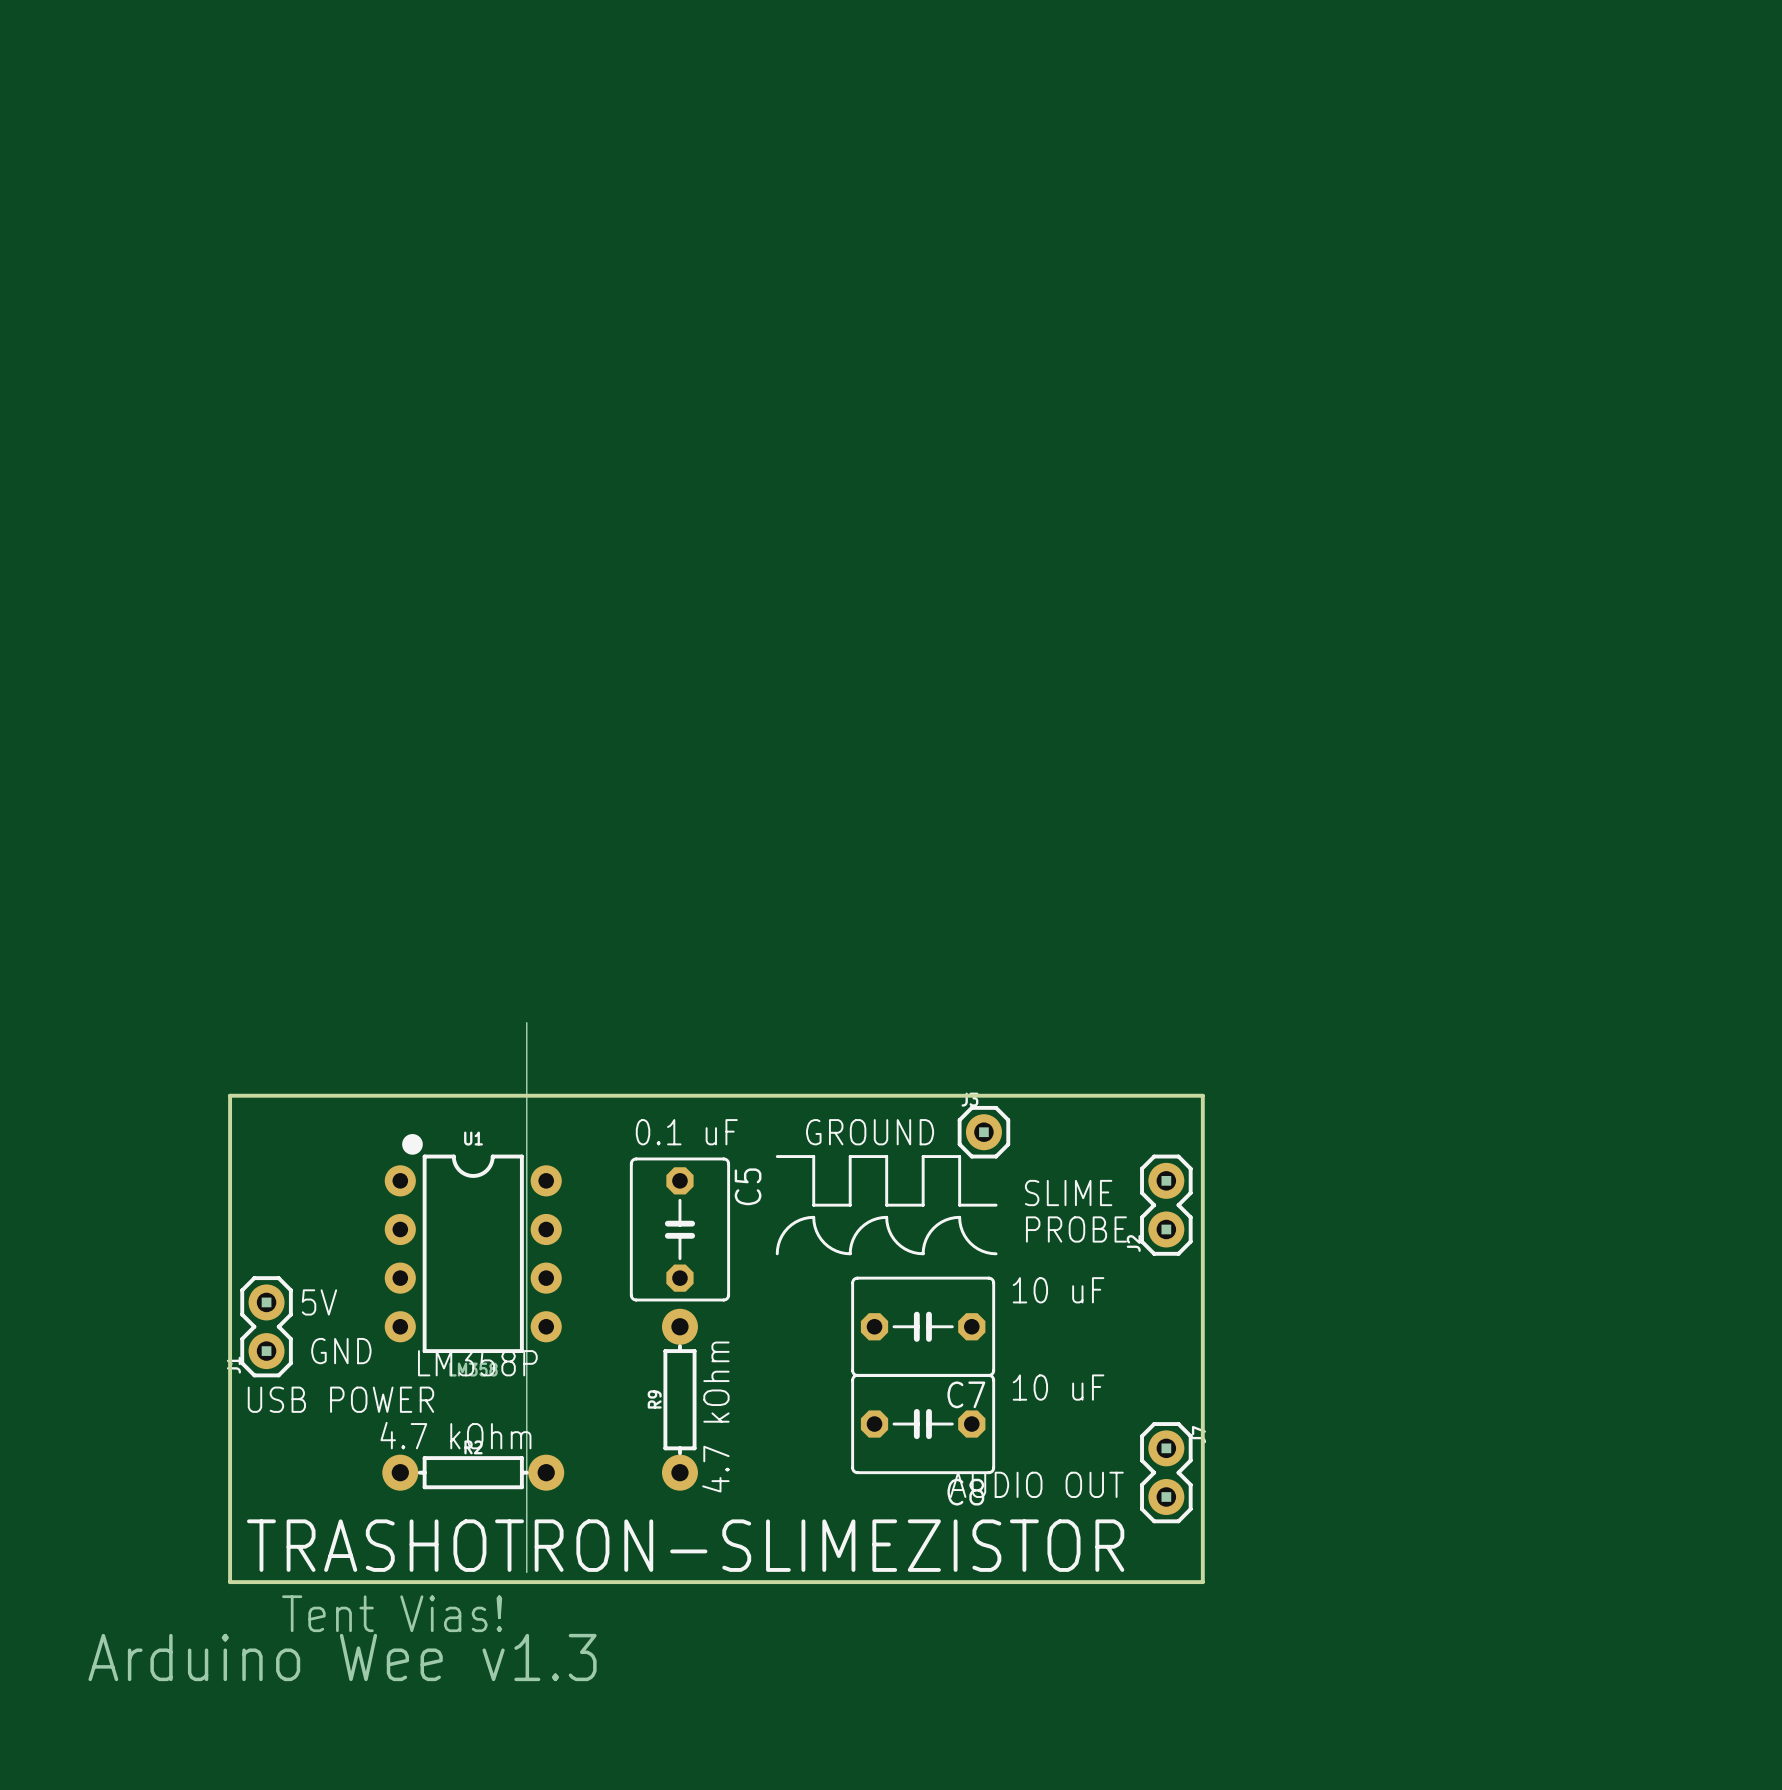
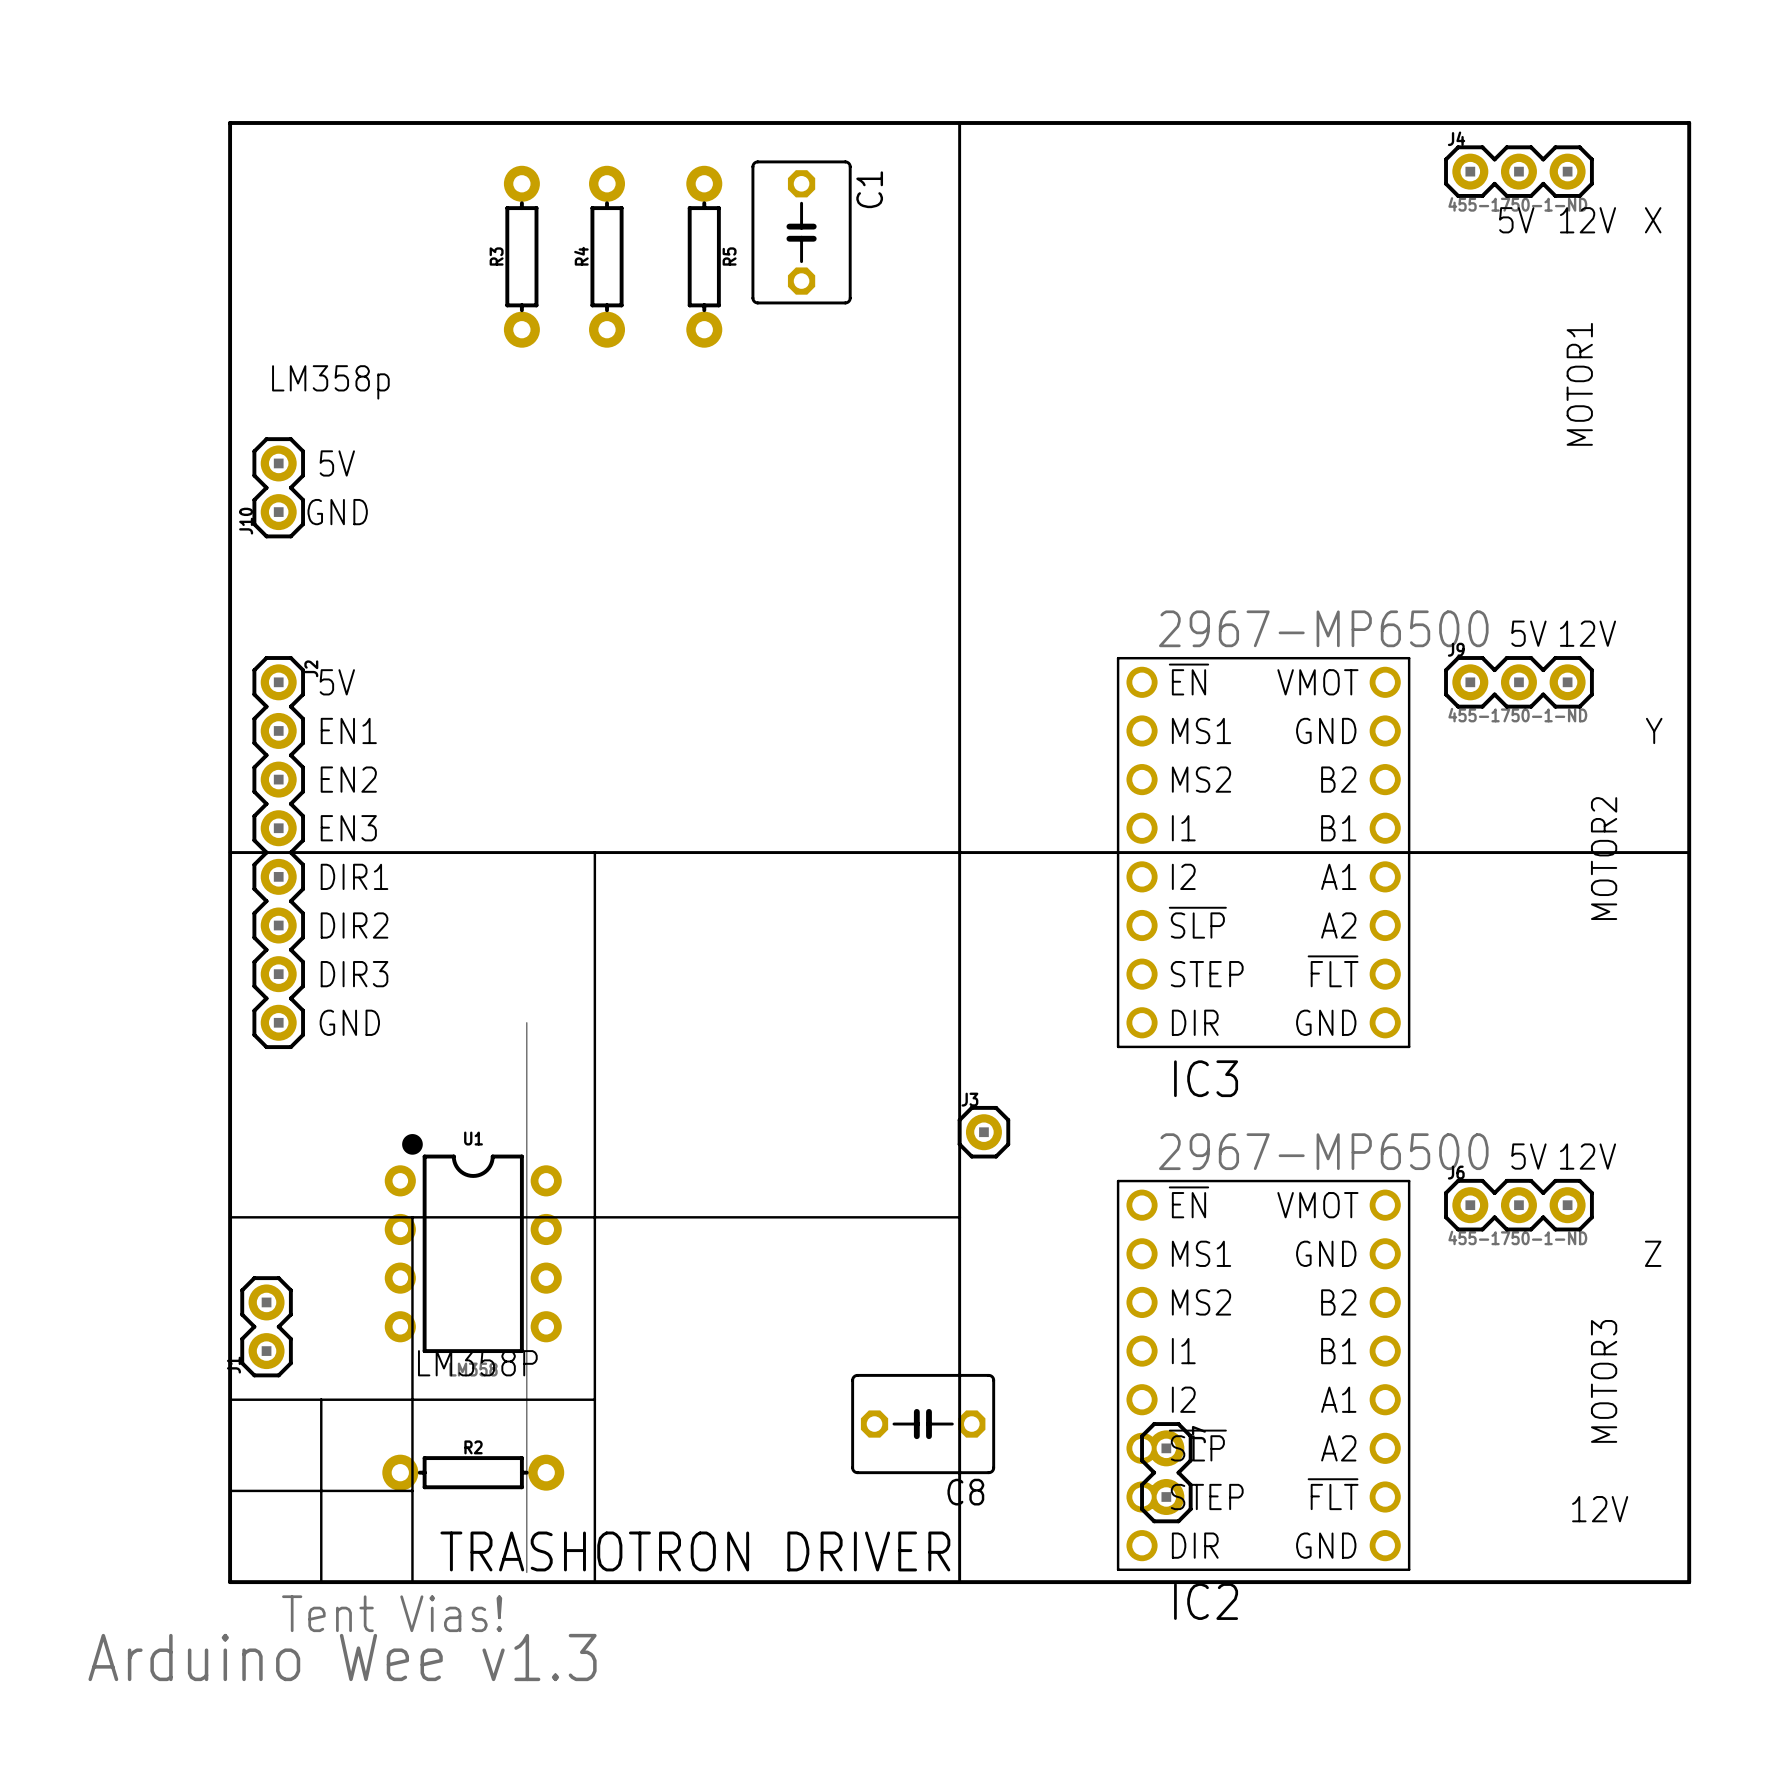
J4: none -> 455-1750-1-ND (1518, 171)
text: none -> 5V (1516, 220)
text: none -> 12V (1587, 220)
text: none -> X (1653, 220)
C1: none -> (801, 232)
R3: none -> (521, 256)
R4: none -> (607, 256)
R5: none -> (704, 256)
text: none -> LM358p (330, 382)
text: none -> MOTOR1 (1579, 384)
text: none -> 5V (337, 463)
J10: none -> (278, 487)
text: none -> GND (337, 512)
text: none -> 5V (1528, 633)
text: none -> 12V (1587, 633)
text: none -> 5V (337, 682)
J9: none -> 455-1750-1-ND (1518, 682)
text: none -> EN1 (348, 730)
text: none -> Y (1654, 730)
text: none -> EN2 (348, 779)
text: none -> EN3 (348, 828)
line: none -> (230, 852) (1689, 852)
line: none -> (594, 852) (594, 1582)
IC3: none -> 2967-MP6500 (1263, 852)
text: none -> MOTOR2 (1604, 858)
text: none -> DIR1 (354, 876)
text: none -> DIR2 (354, 925)
text: none -> DIR3 (354, 974)
board edge: (230, 1095) (1202, 1095) (1202, 1582) -> (230, 1095) (230, 122) (1689, 122) (1689, 1582) (1202, 1582)
text: 0.1 uF (686, 1132) -> none
text: GROUND (870, 1132) -> none
J2 footprint: [1140, 1154, 1193, 1256] -> [252, 656, 305, 1050]
line: (777, 1156) (813, 1156) (813, 1205) (850, 1205) (850, 1156) (886, 1156) (886, 1205) (923, 1205) (923, 1156) (959, 1156) -> (959, 122) (959, 1156)
text: none -> 5V (1528, 1156)
text: none -> 12V (1587, 1156)
text: SLIME (1068, 1193) -> none
line: (959, 1205) (996, 1205) -> (959, 1205) (959, 1582)
J6: none -> 455-1750-1-ND (1518, 1205)
line: none -> (230, 1217) (959, 1217)
line: none -> (412, 1217) (412, 1582)
C5: (679, 1229) -> none
text: PROBE (1076, 1229) -> none
J2 name position: J2 (1133, 1243) -> J2 (311, 668)
line: (777, 1253) (780, 1239) (787, 1228) (799, 1220) (813, 1217) (814, 1226) (821, 1239) (831, 1248) (840, 1252) (850, 1253) (855, 1235) (864, 1224) (877, 1218) (886, 1217) (889, 1231) (897, 1243) (909, 1251) (923, 1253) (925, 1239) (933, 1228) (945, 1220) (959, 1217) (962, 1231) (970, 1243) (982, 1251) (996, 1253) -> none
text: none -> Z (1653, 1253)
text: 10 uF (1058, 1290) -> none
text: 5V (319, 1302) -> none
C7: (923, 1326) -> none
text position: GND (341, 1351) -> GND (349, 1022)
IC2: none -> 2967-MP6500 (1263, 1375)
text: none -> MOTOR3 (1604, 1381)
text: 10 uF (1058, 1387) -> none
line: none -> (230, 1399) (594, 1399)
line: none -> (321, 1399) (321, 1582)
text: USB POWER (340, 1399) -> none
R9: (679, 1399) -> none
text: 4.7 kOhm (715, 1417) -> none
text: 4.7 kOhm (455, 1435) -> none
text: AUDIO OUT (1036, 1484) -> none
line: none -> (230, 1490) (412, 1490)
text: none -> 12V (1600, 1509)
text: TRASHOTRON-SLIMEZISTOR (685, 1545) -> TRASHOTRON DRIVER (695, 1551)

